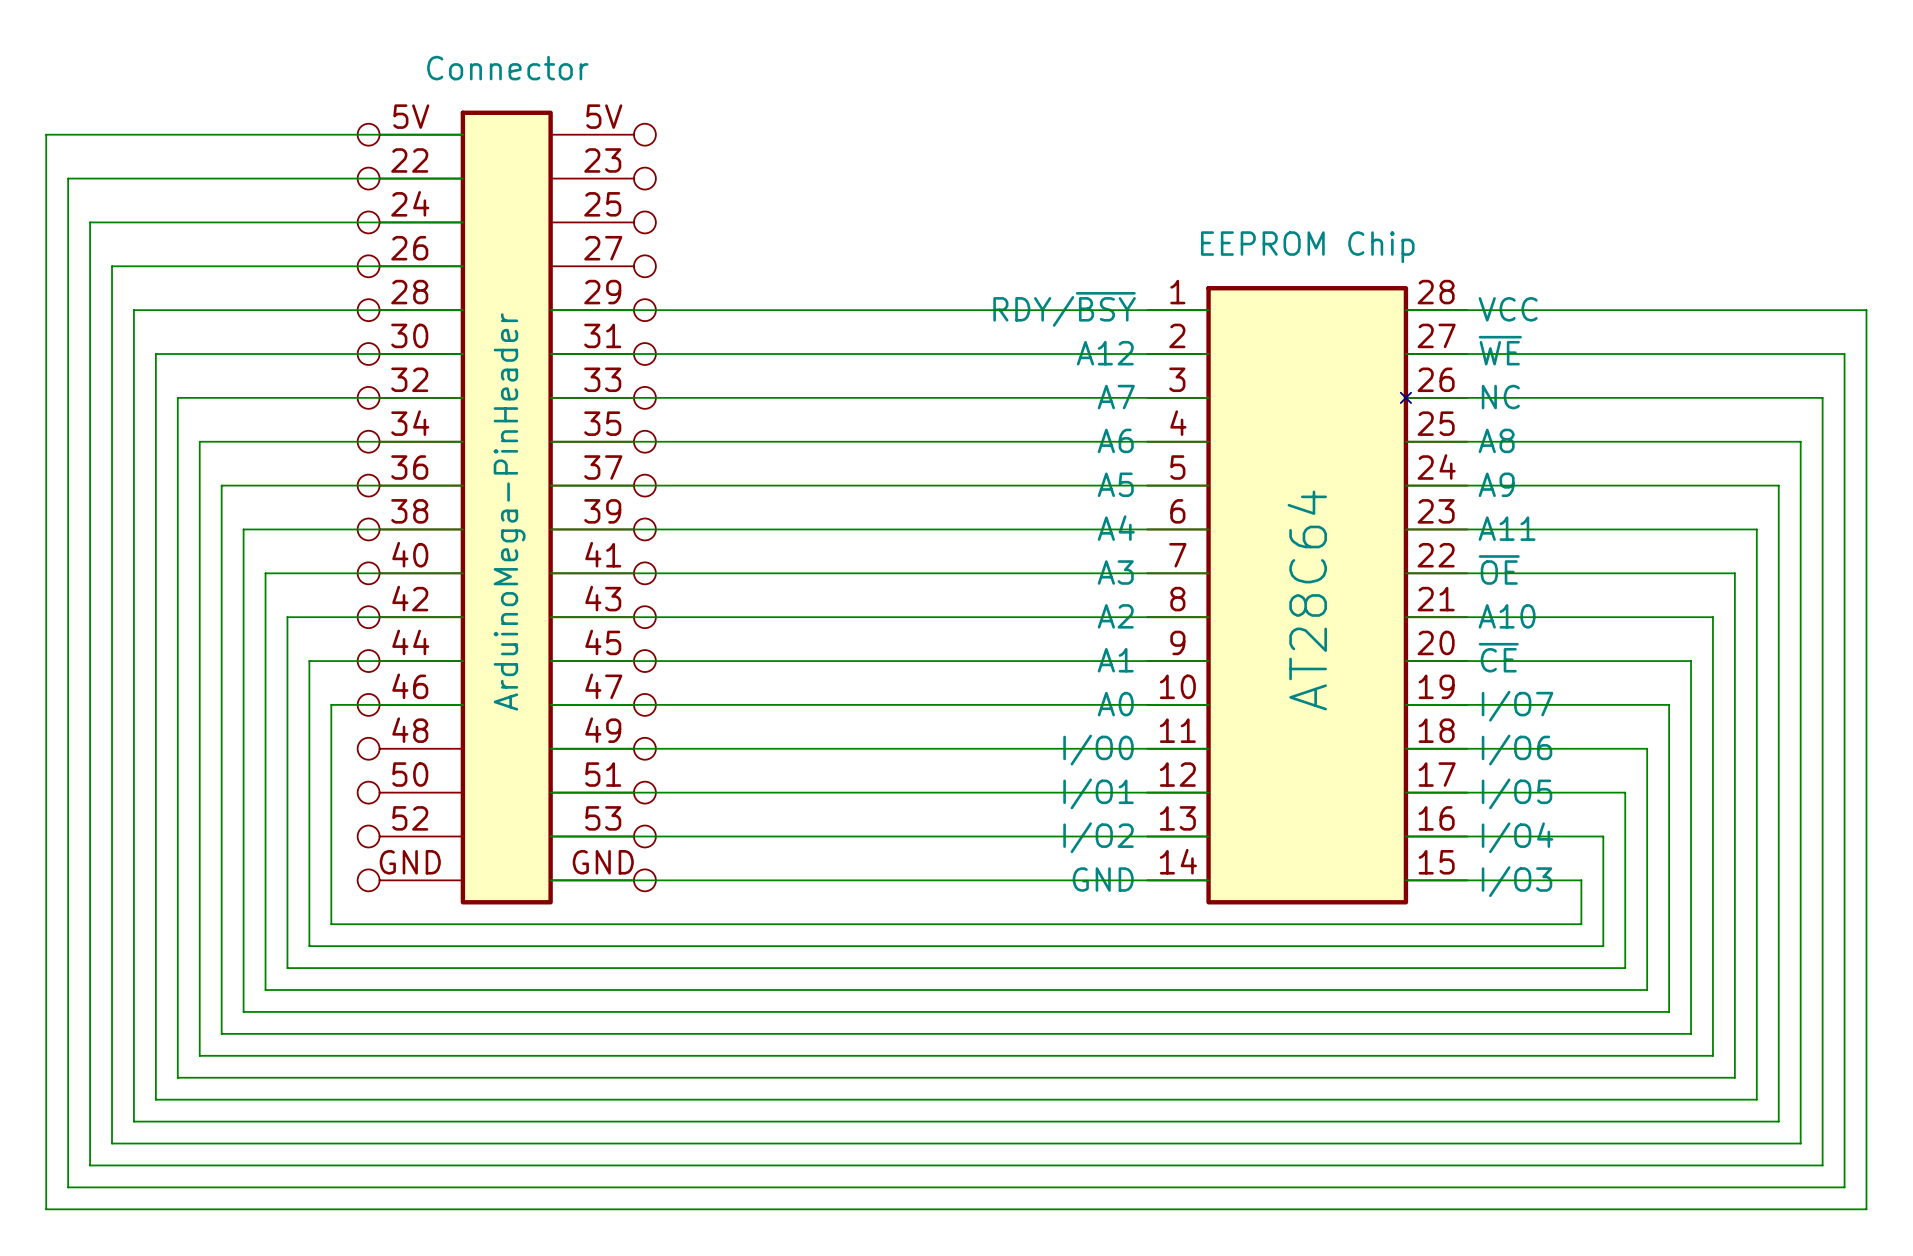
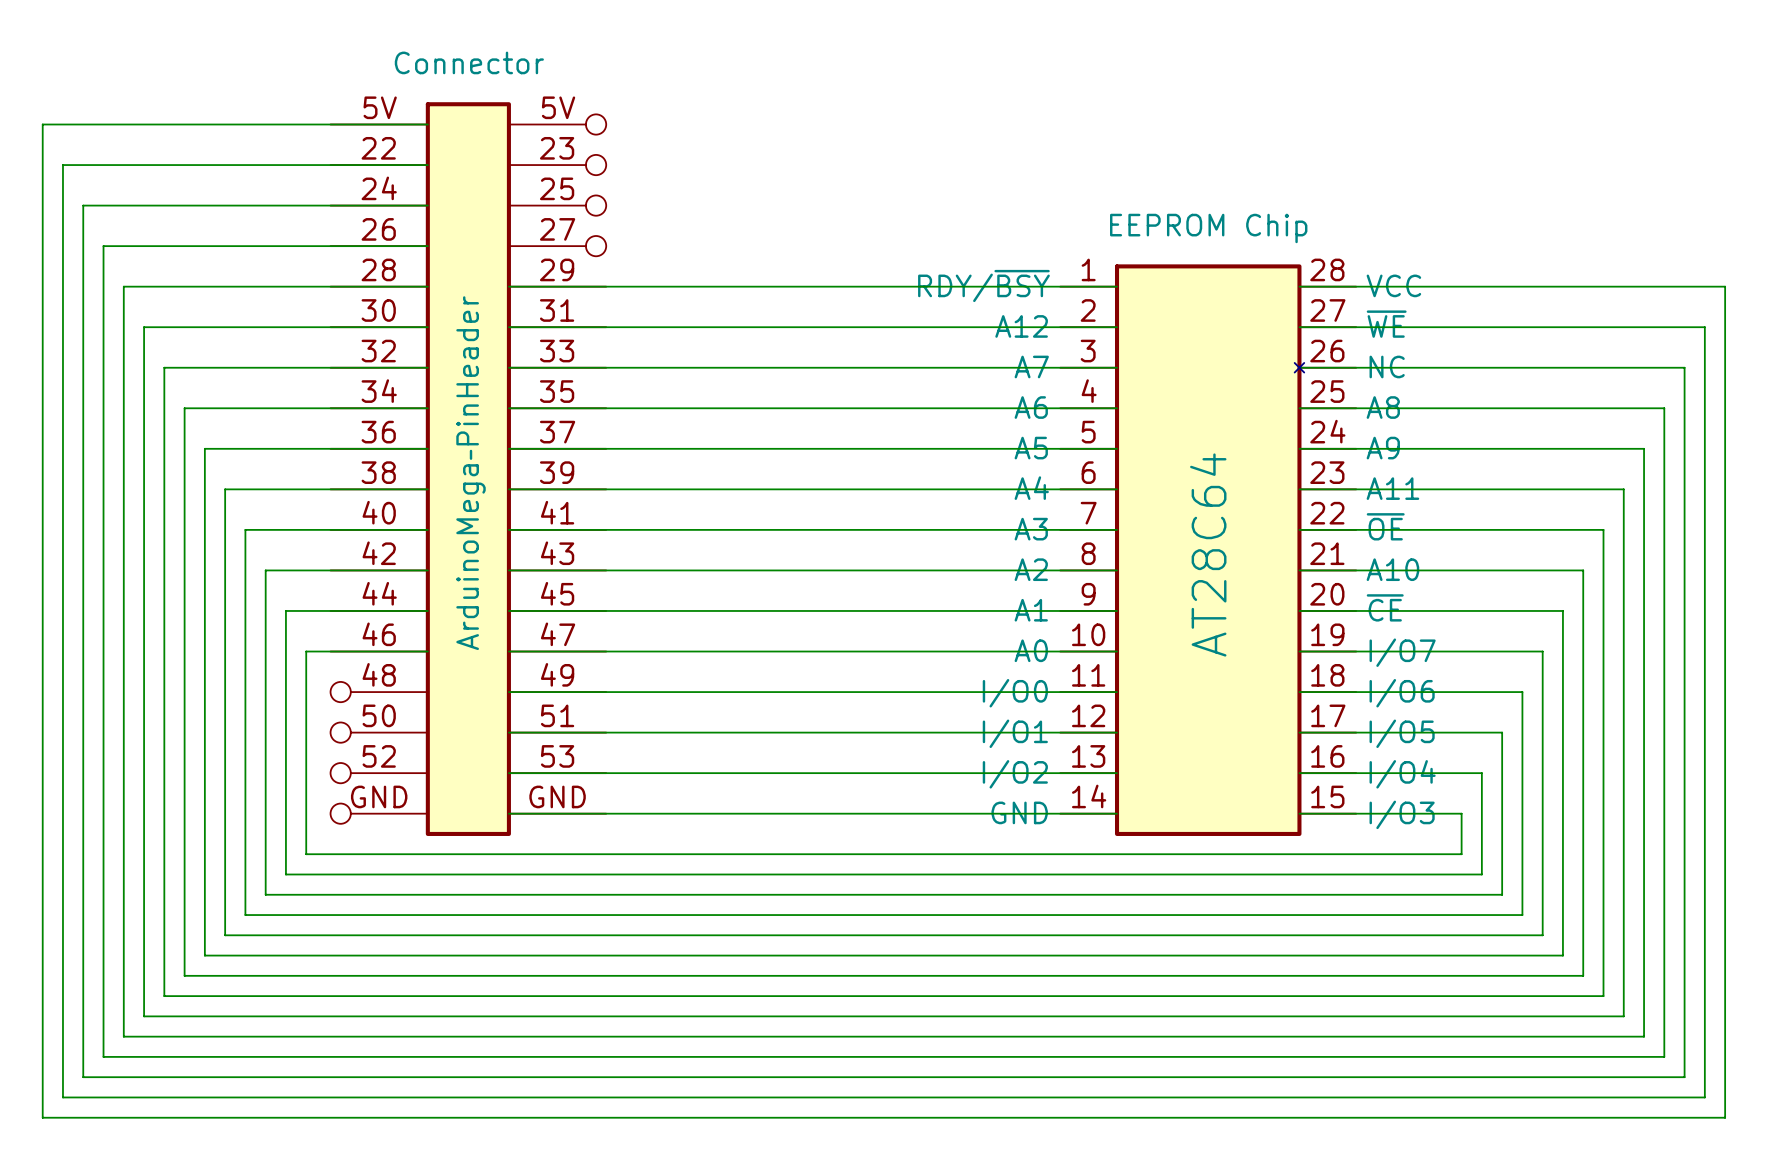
ArduinoMega-PinHeader: Connector (506, 507) -> none
ArduinoMega–PinHeader: none -> Connector (468, 469)

